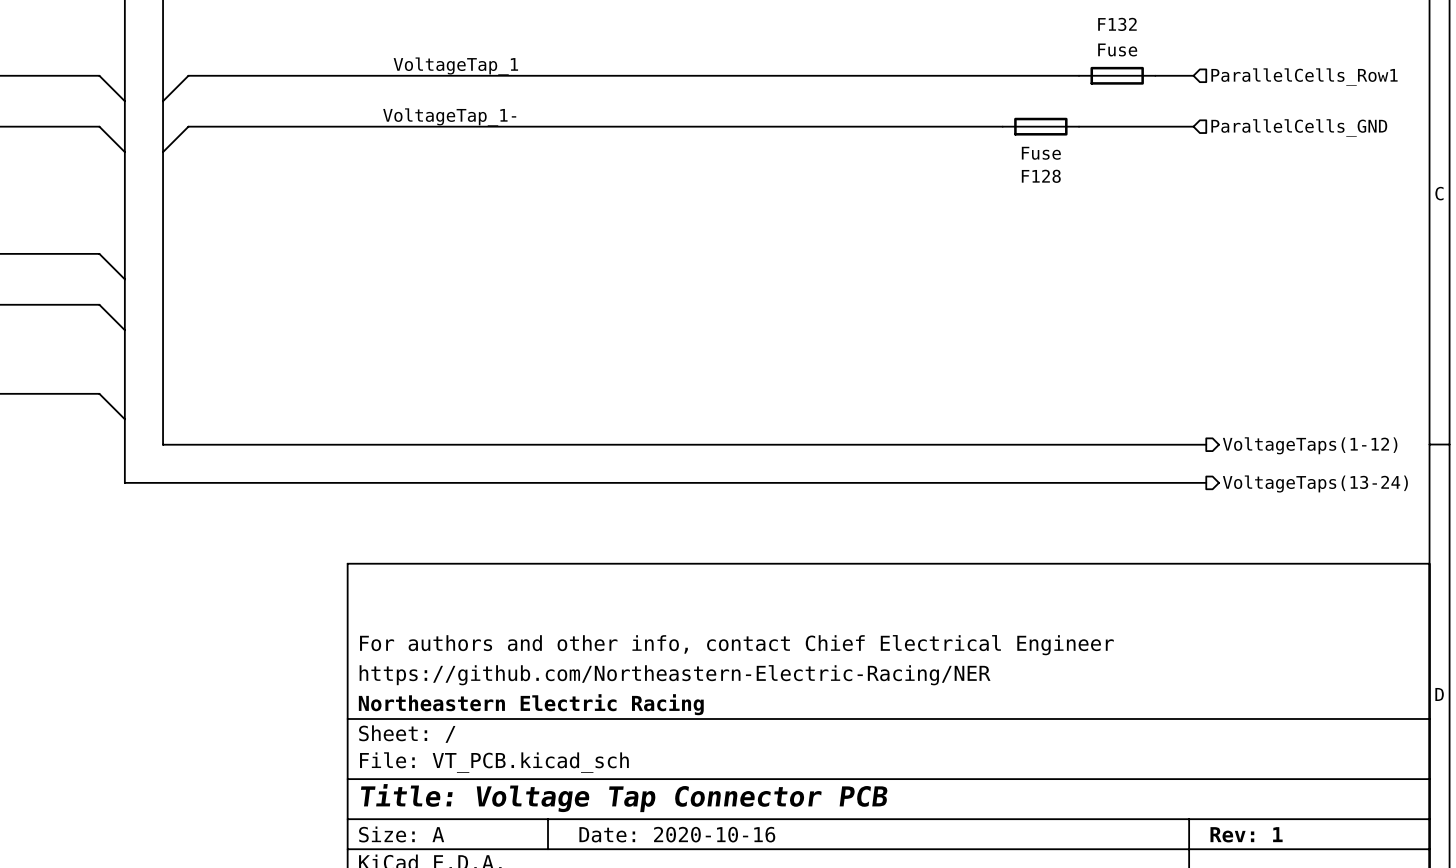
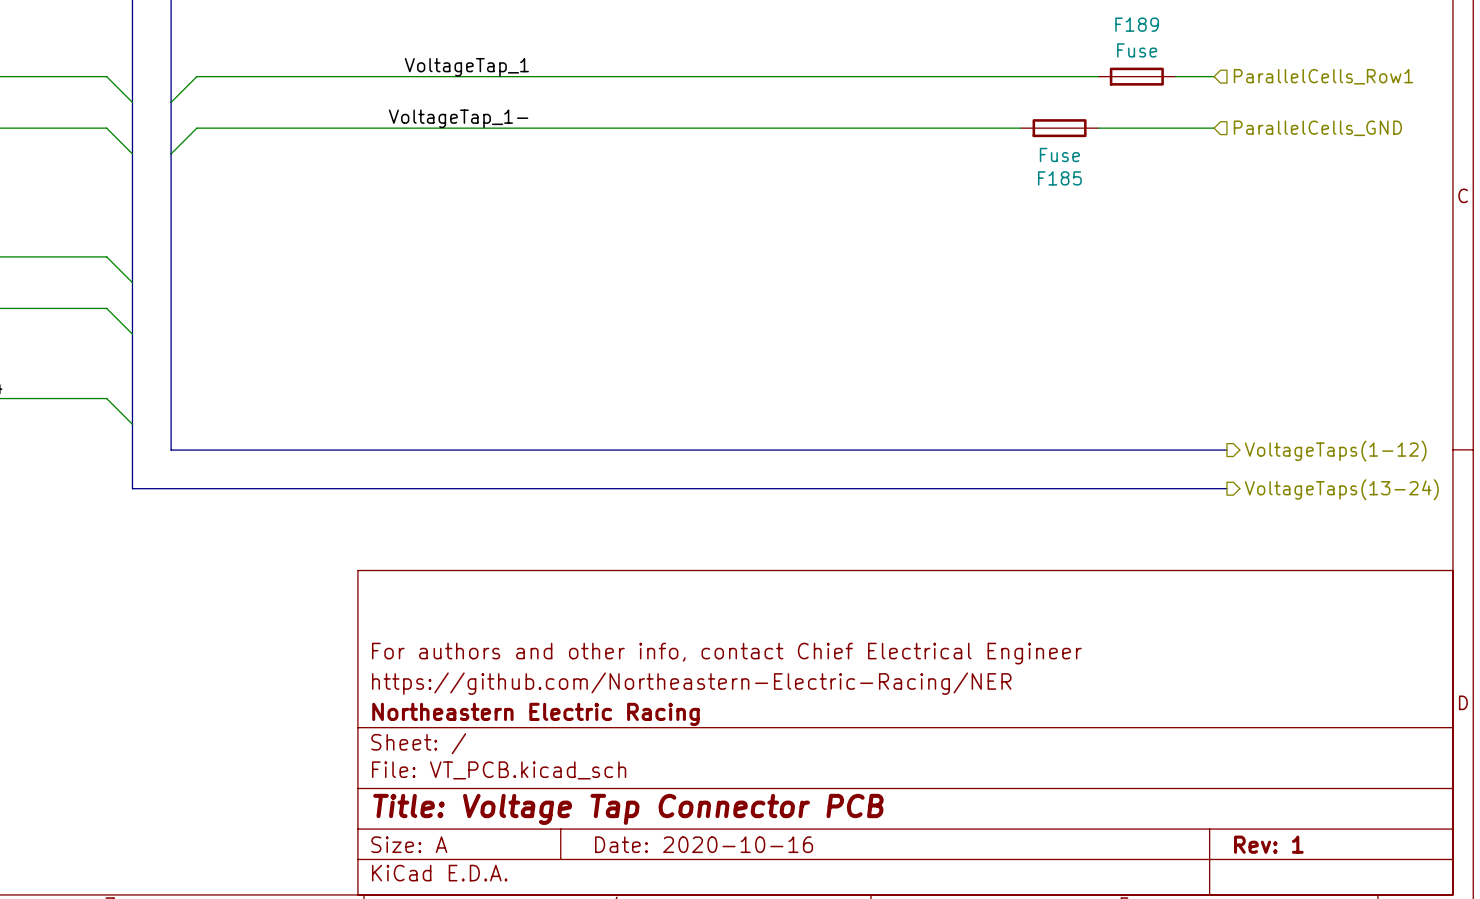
F132 name: F132 (1117, 24) -> F189 (1137, 24)
F128 name: F128 (1041, 176) -> F185 (1059, 178)

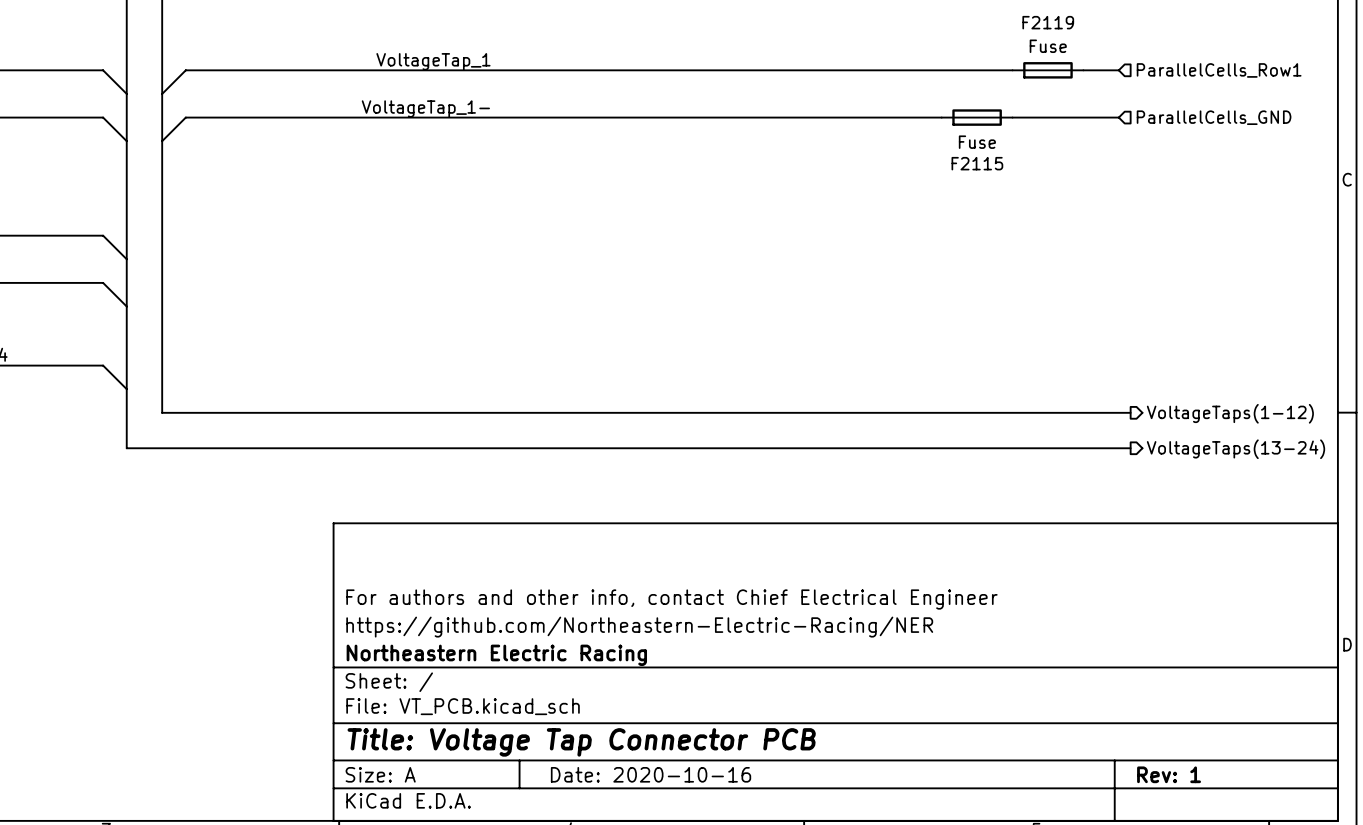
F189 name: F189 (1137, 24) -> F2119 (1048, 22)
F185 name: F185 (1059, 178) -> F2115 (977, 163)

